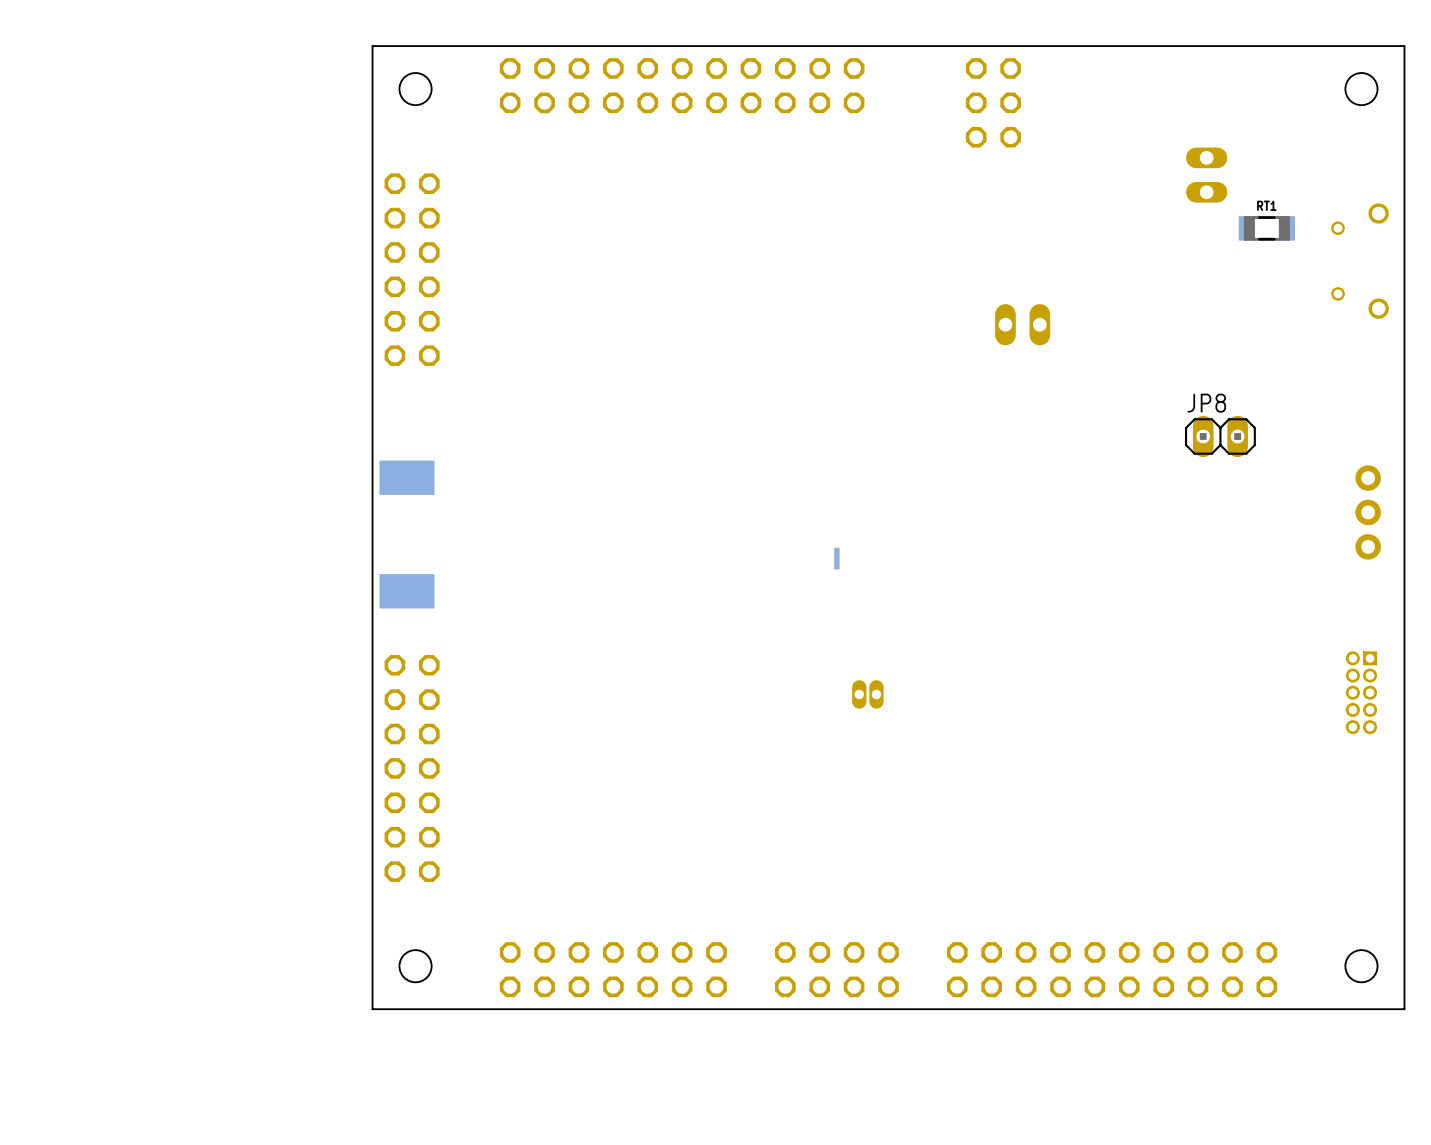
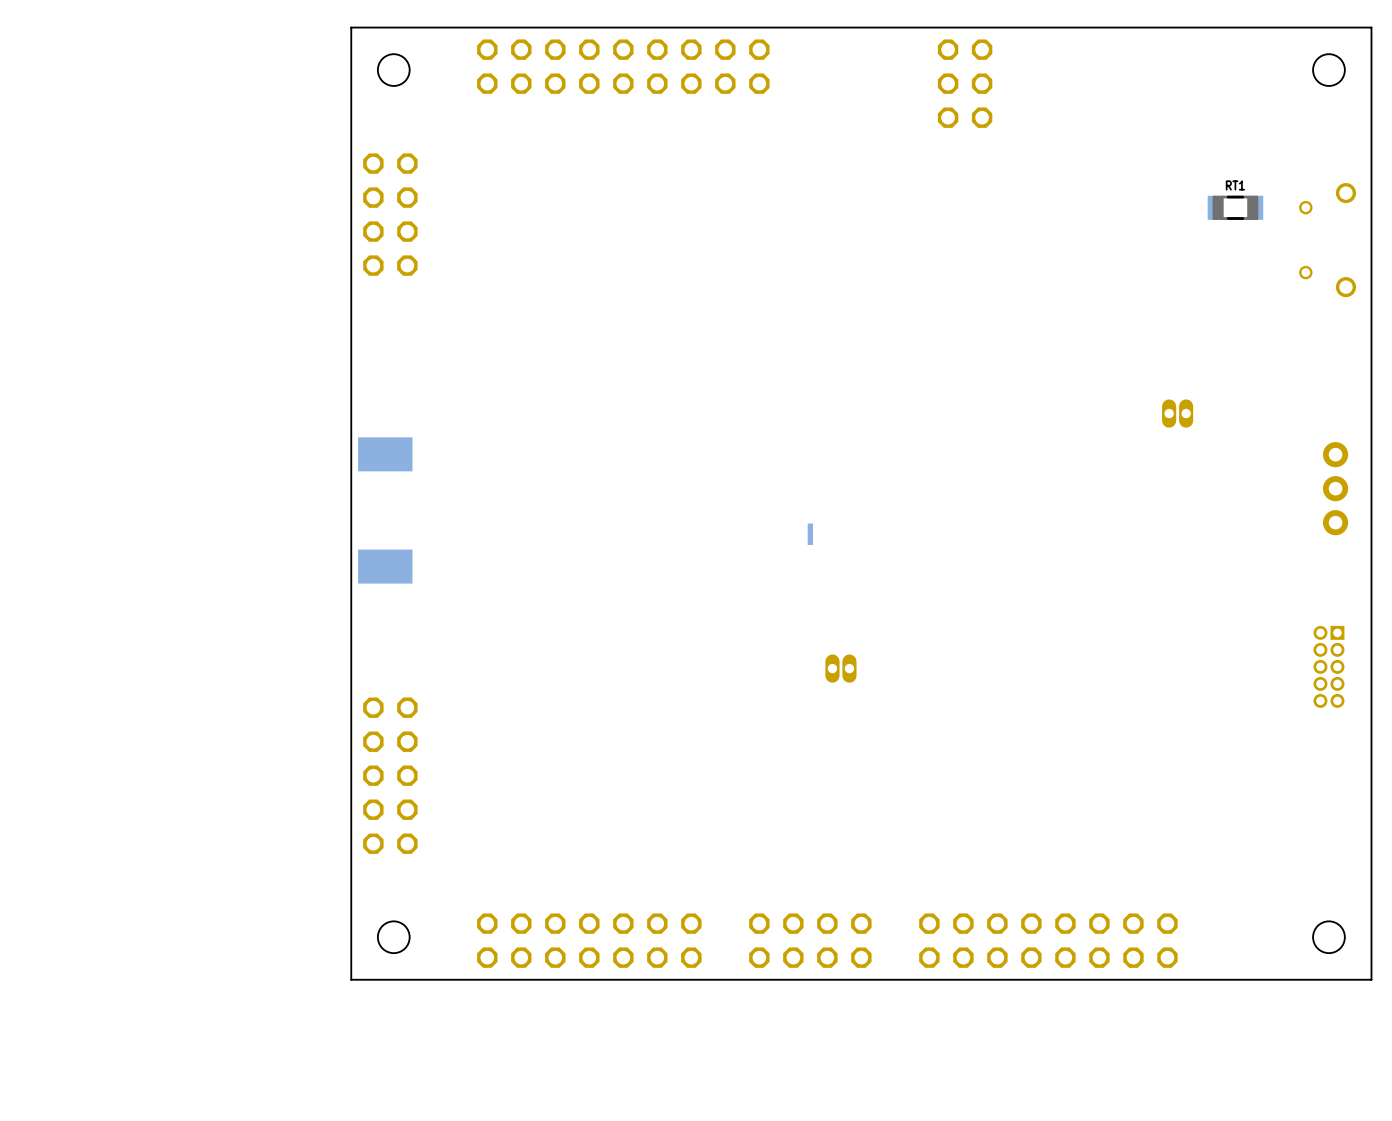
part: (682, 85) -> none
part: (1206, 175) -> none
part: (412, 269) -> none
part: (1022, 324) -> none
part: none -> (1177, 413)
JP8: (1220, 436) -> none
part: (412, 768) -> none
part: (1112, 969) -> none

